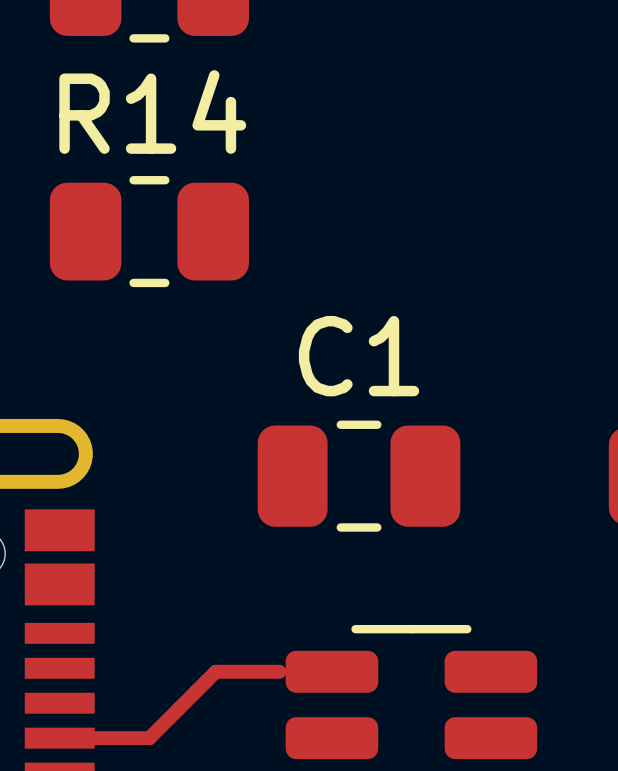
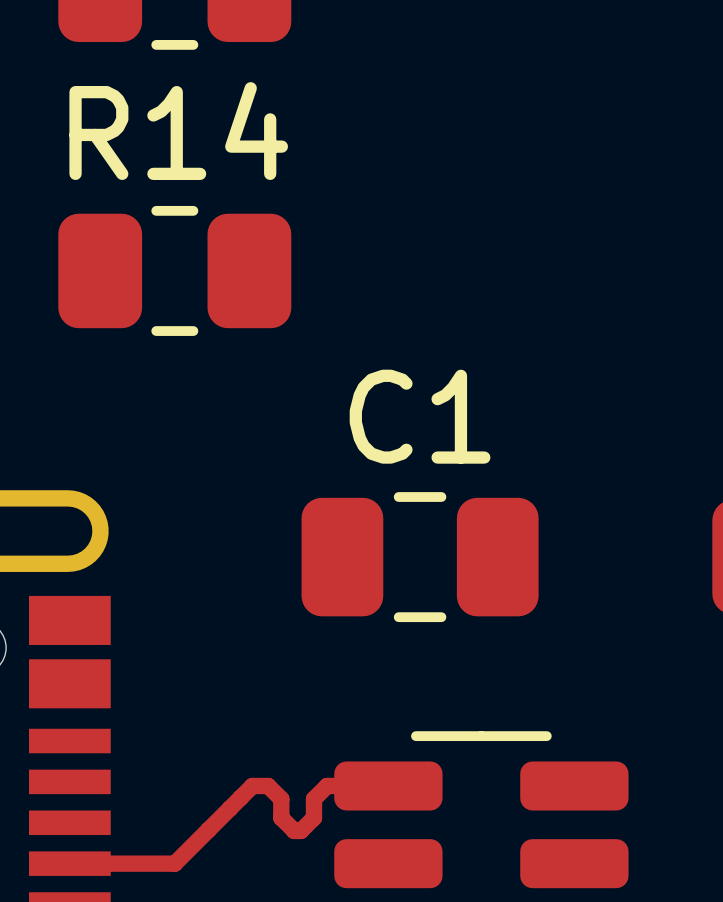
track: (229, 671) (279, 671) -> (268, 785) (281, 799) (281, 817) (294, 830) (300, 830) (314, 817) (314, 799) (327, 785) (388, 785)

